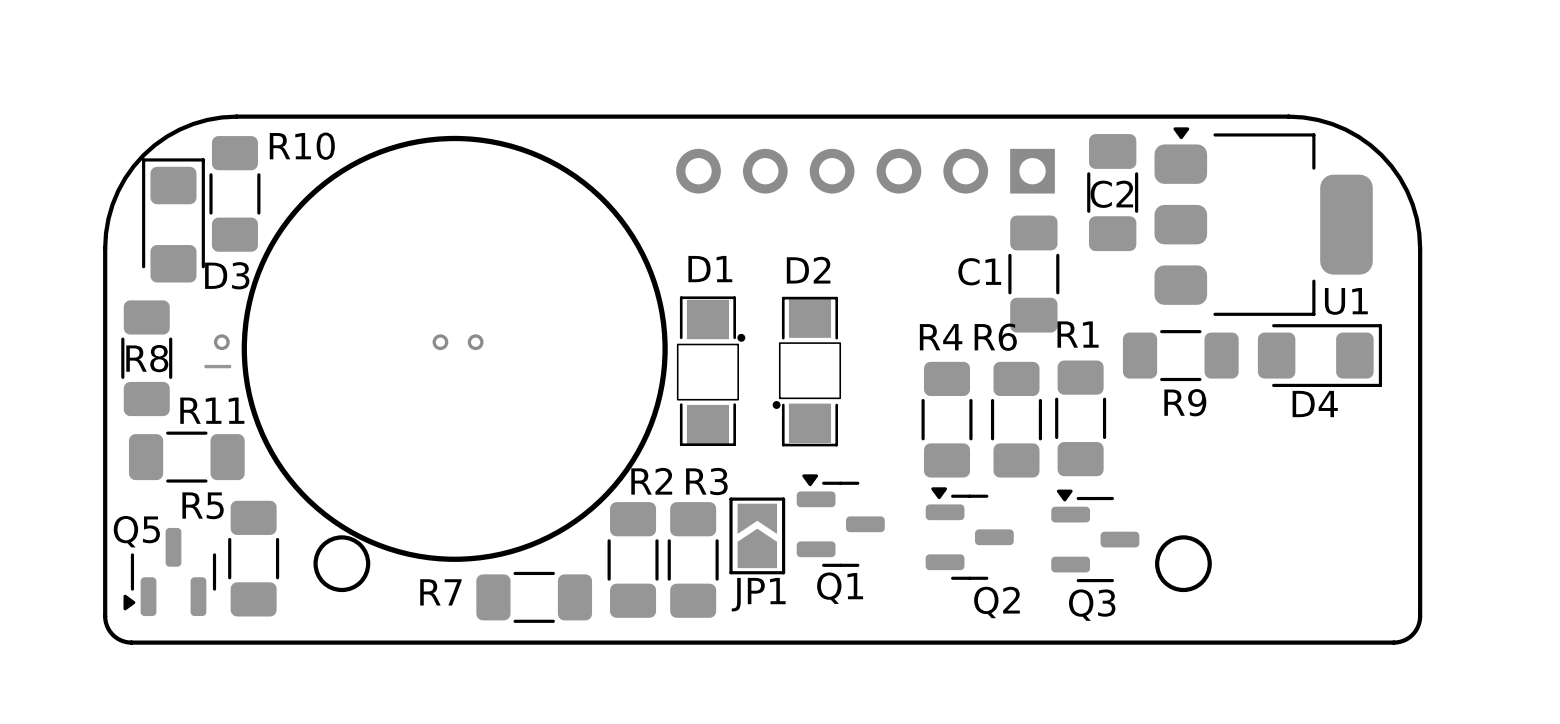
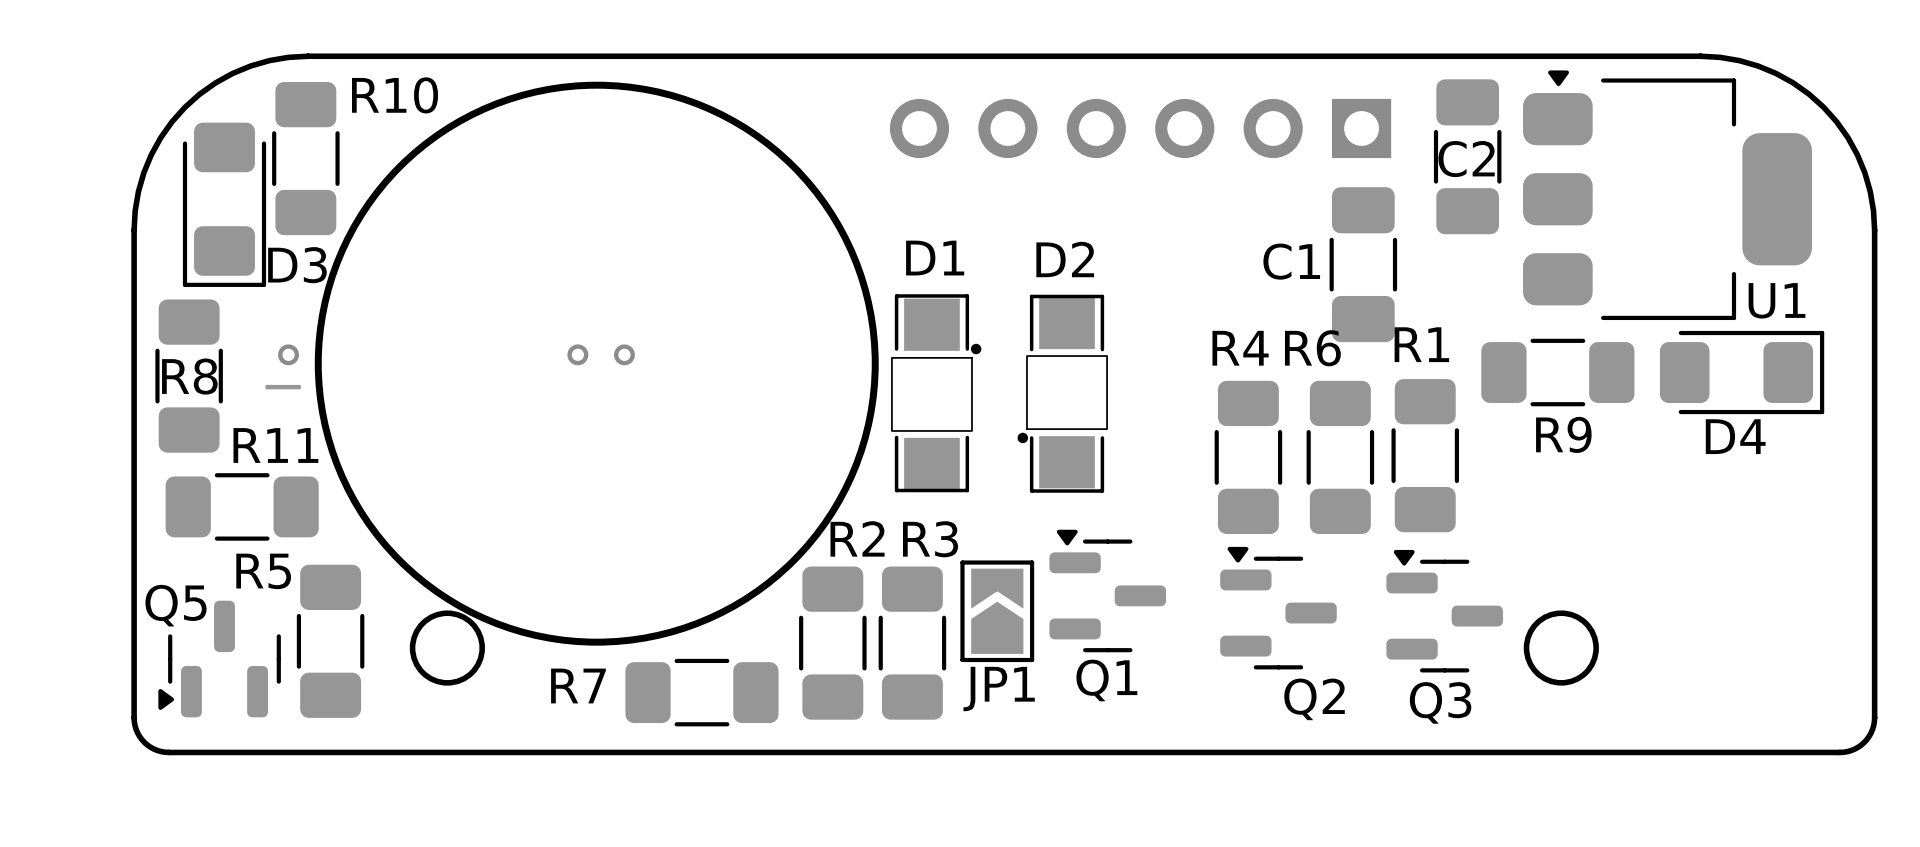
D3 rotation: 0° (173, 220) -> 180° (224, 204)

